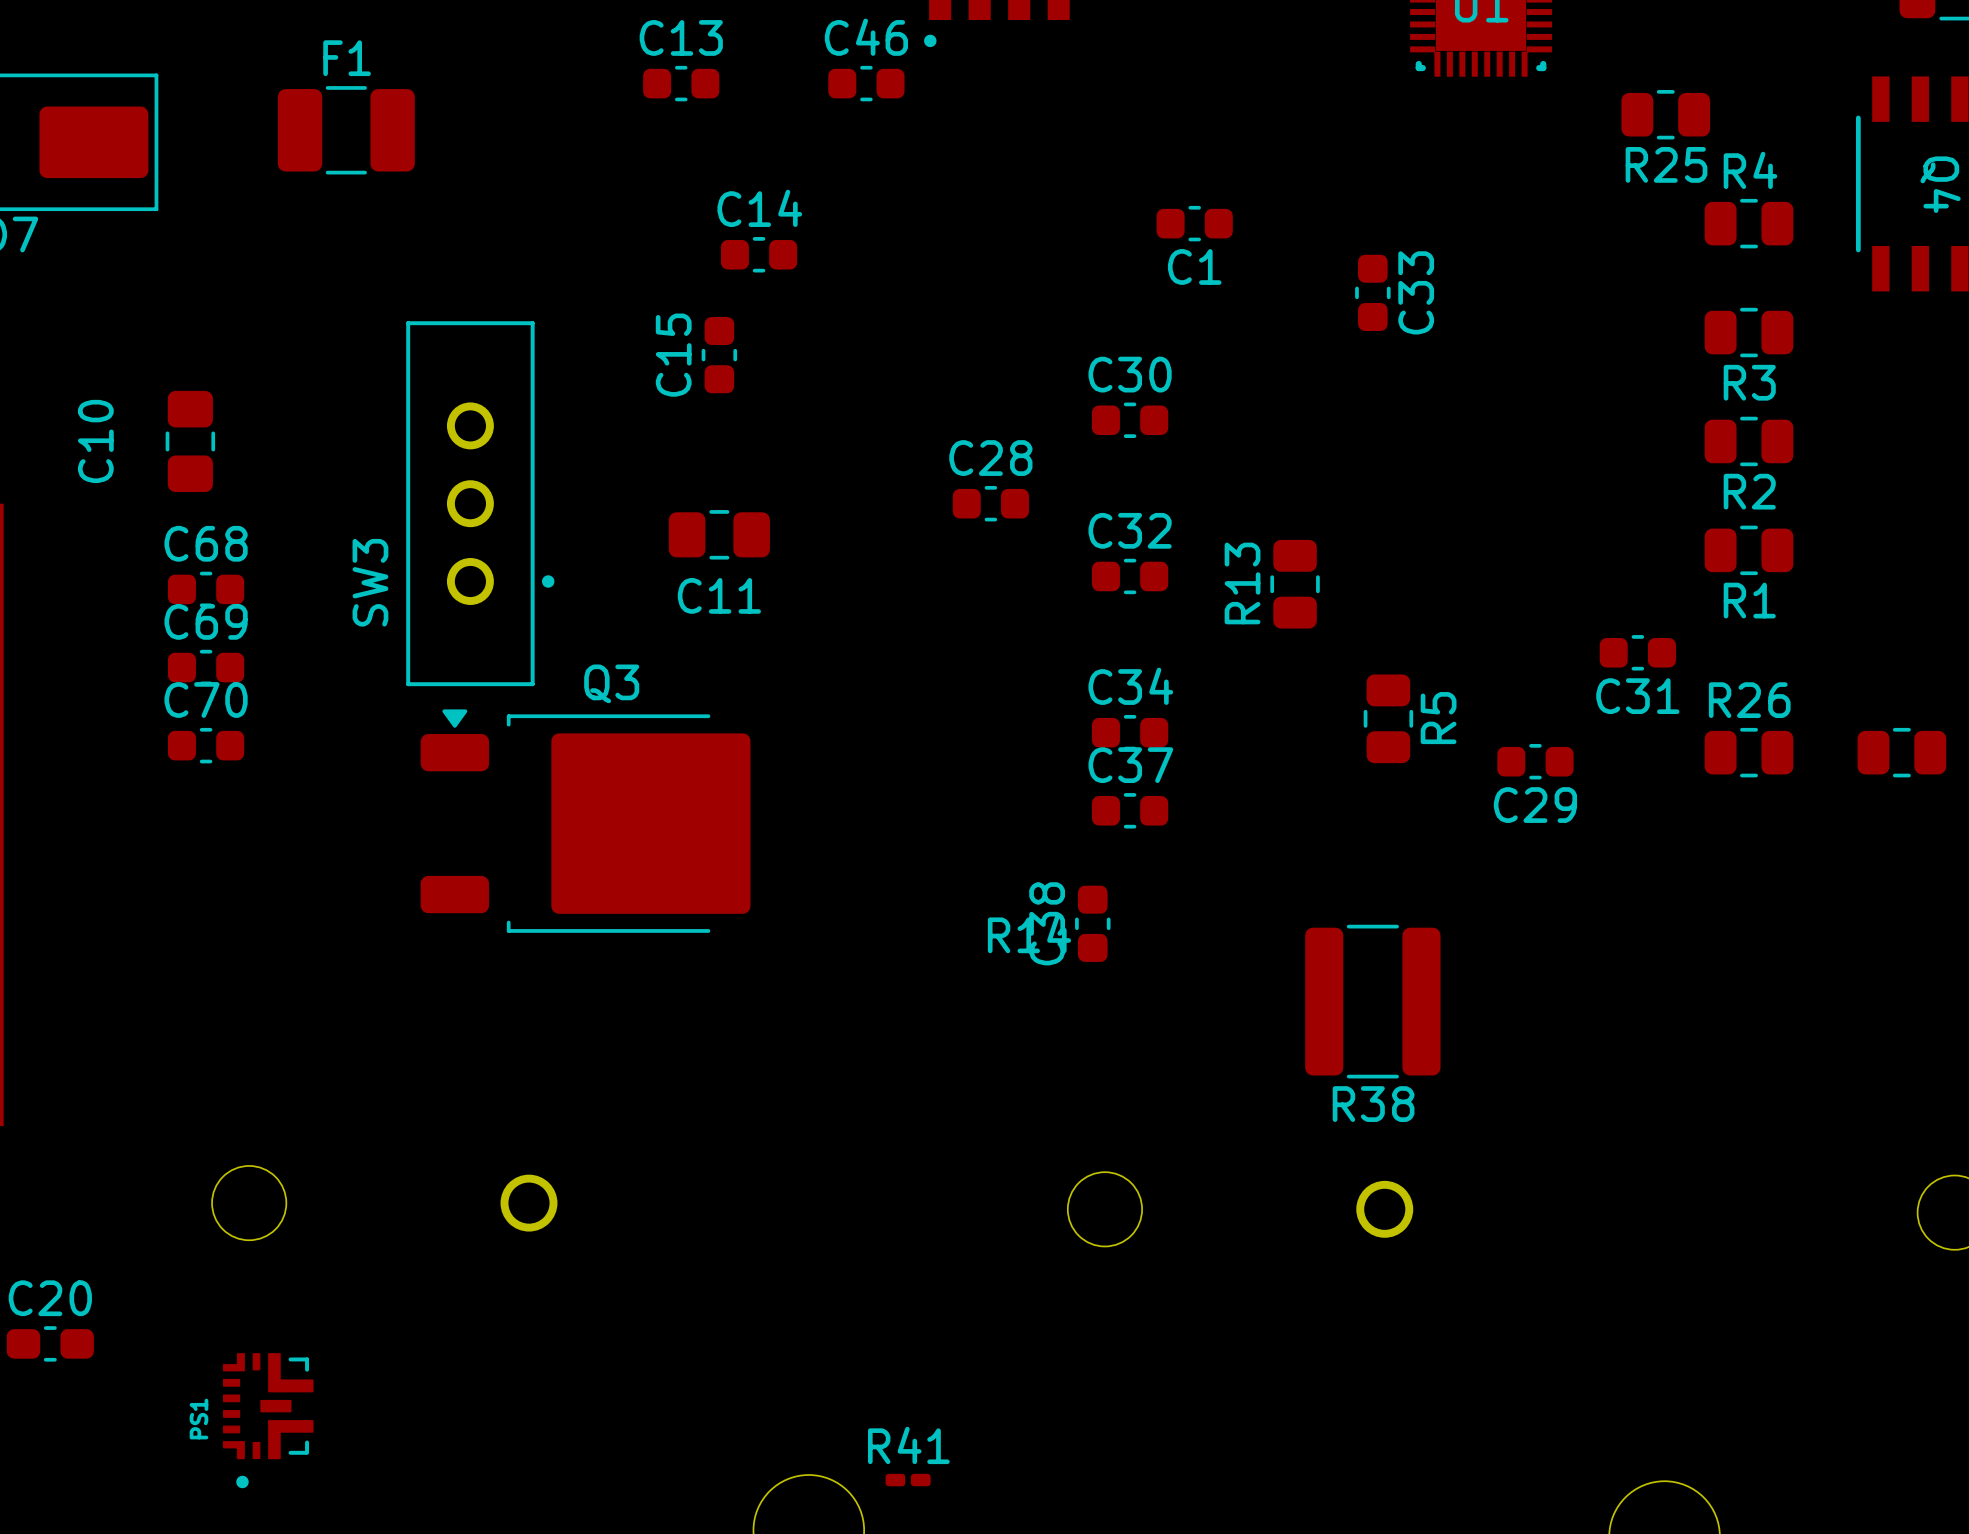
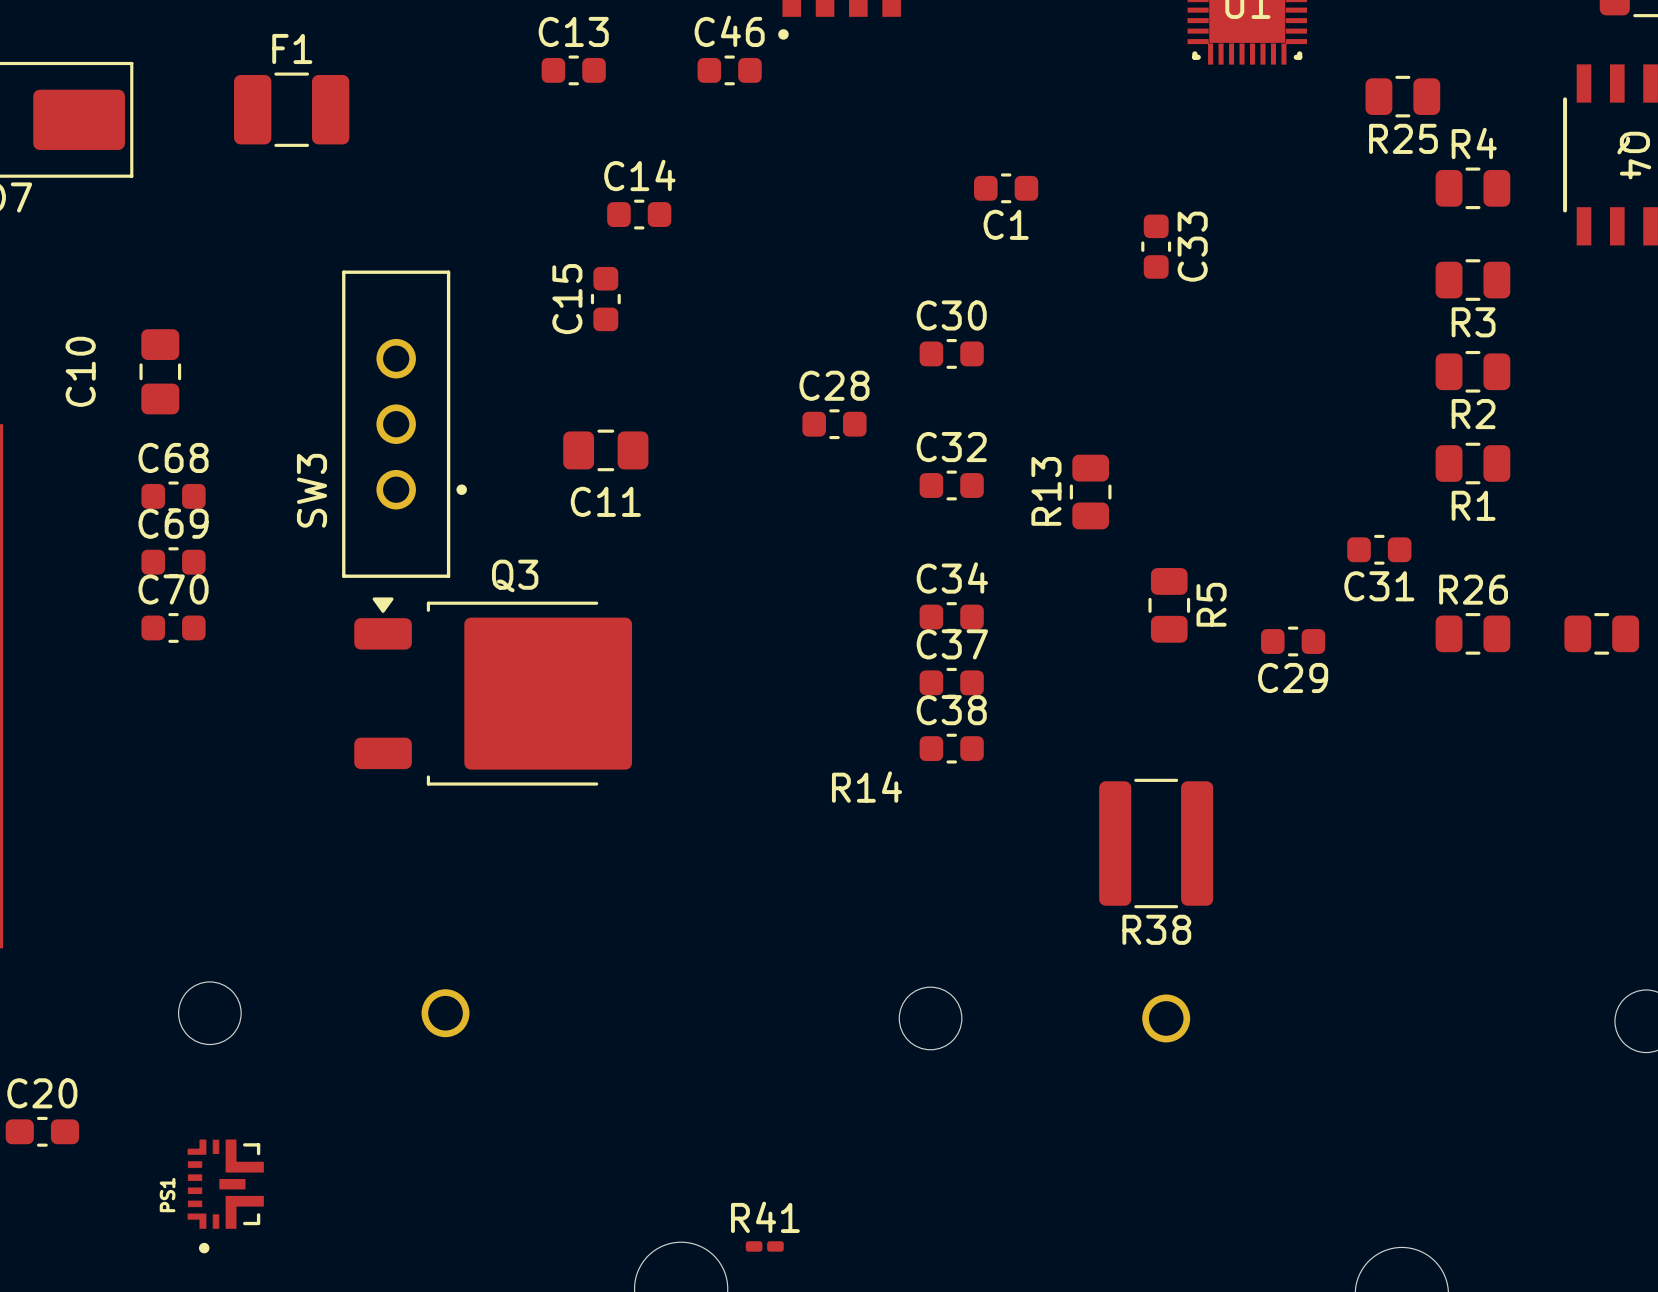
C38 rotation: 0° (1092, 923) -> 90° clockwise (951, 748)
C38 position: (1092, 923) -> (951, 748)

